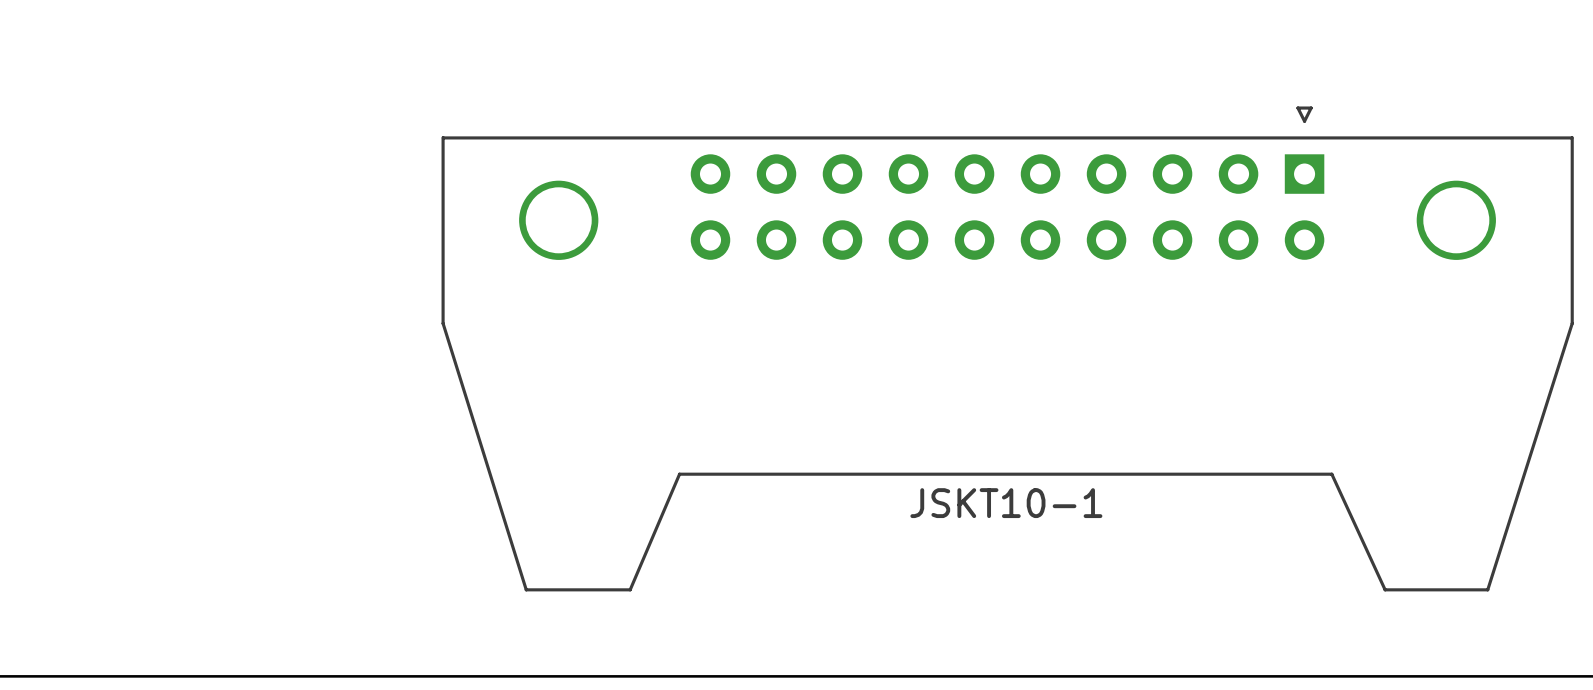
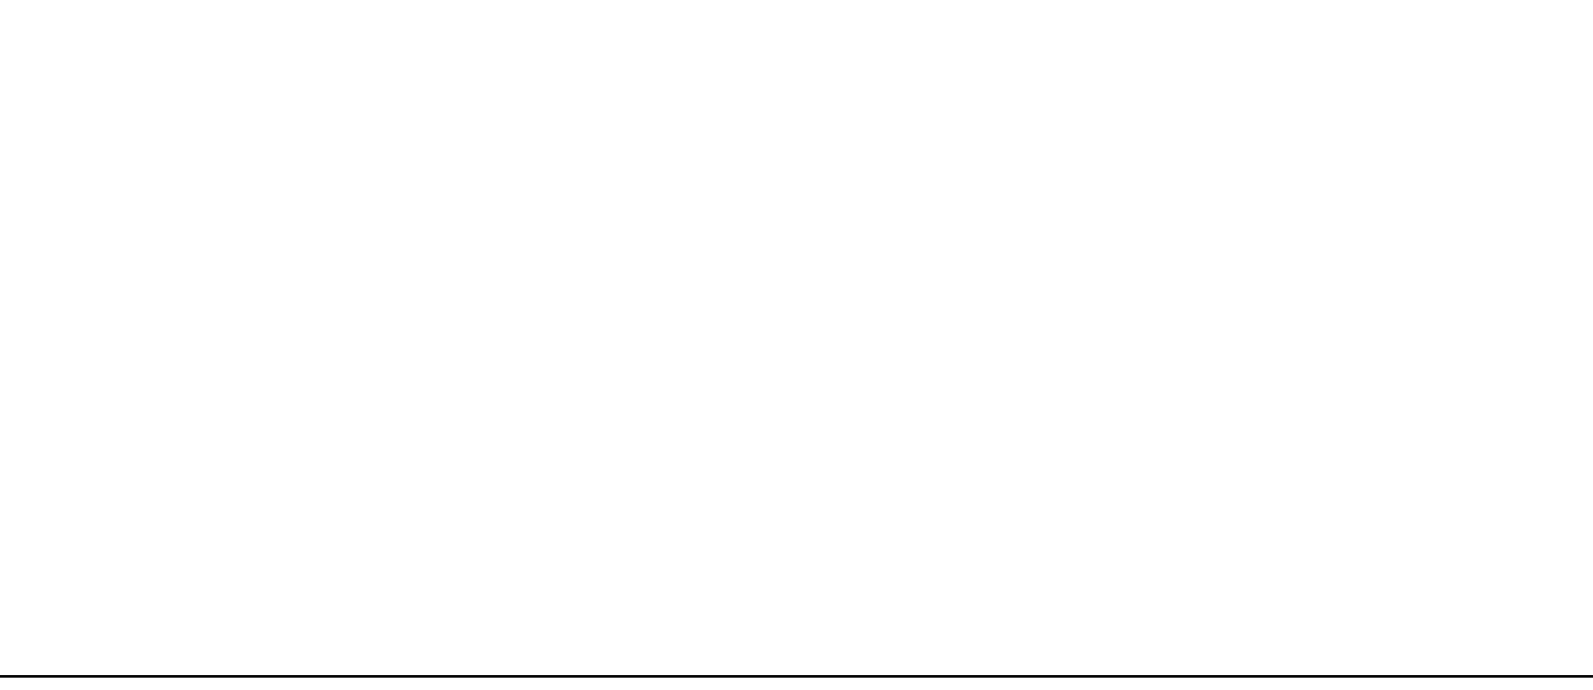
JSKT10-1: (1007, 348) -> none

